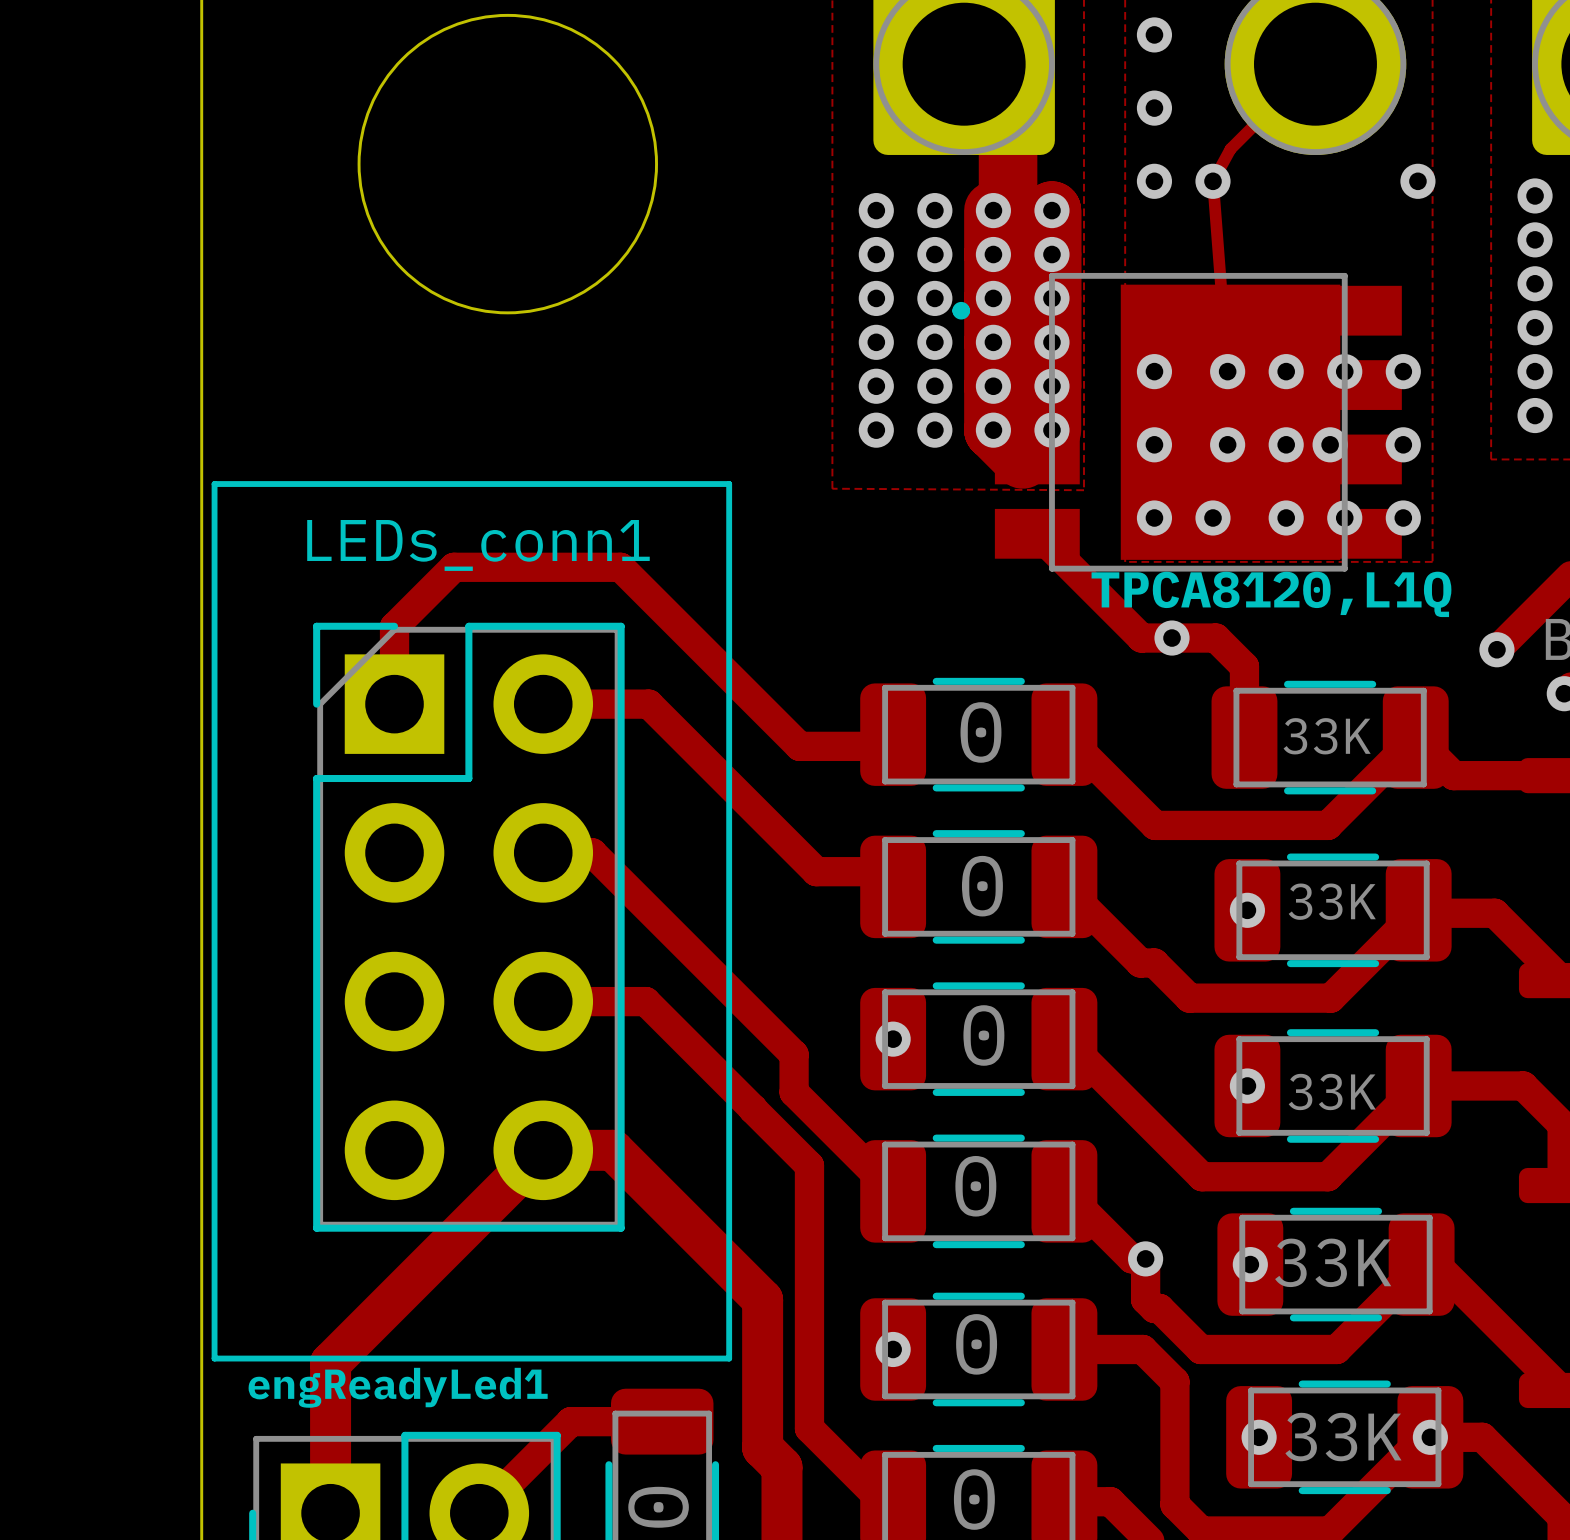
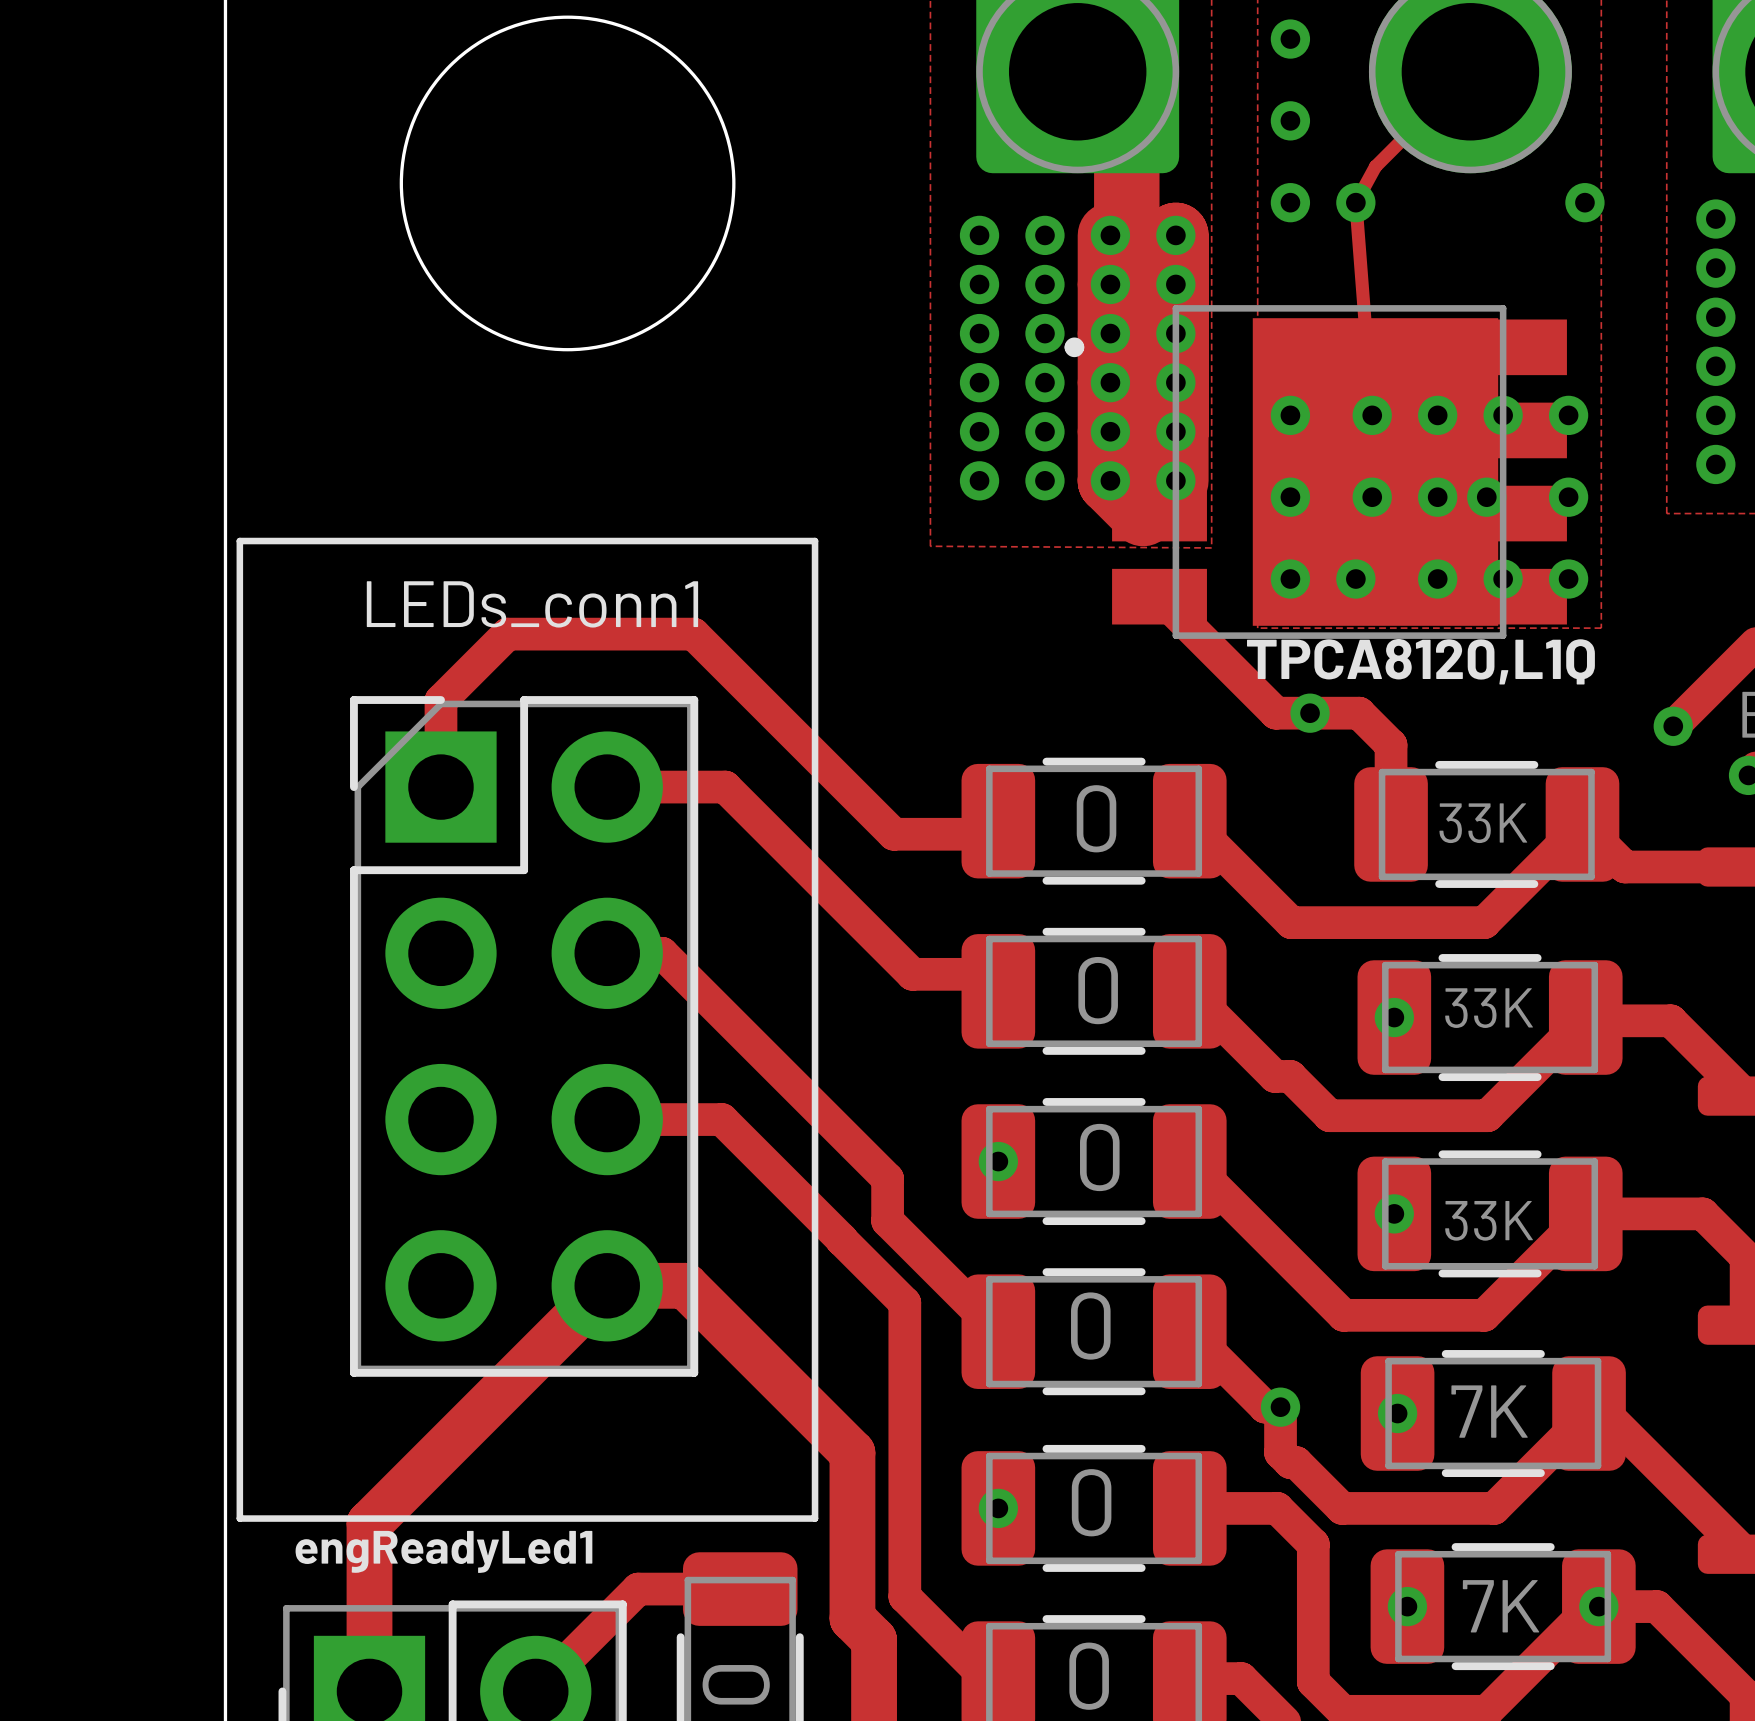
part value: 33K (1333, 1262) -> 7K (1489, 1411)
part value: 33K (1343, 1437) -> 7K (1501, 1606)

